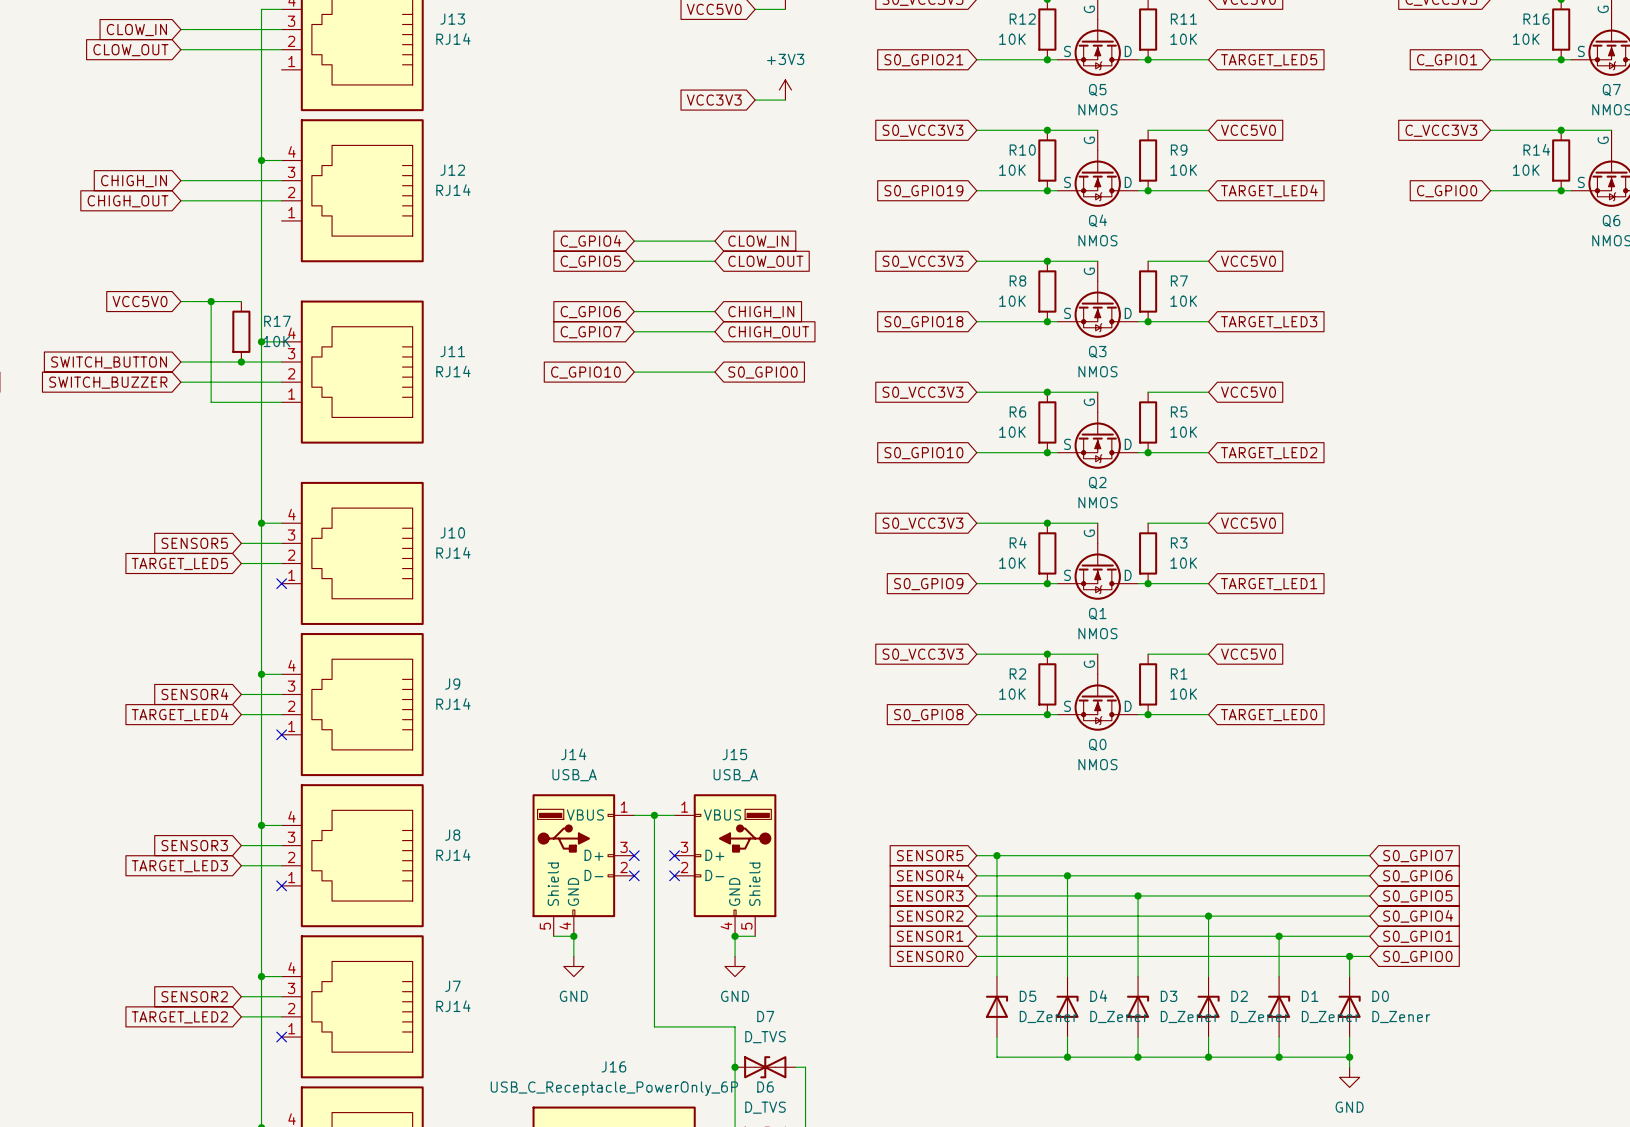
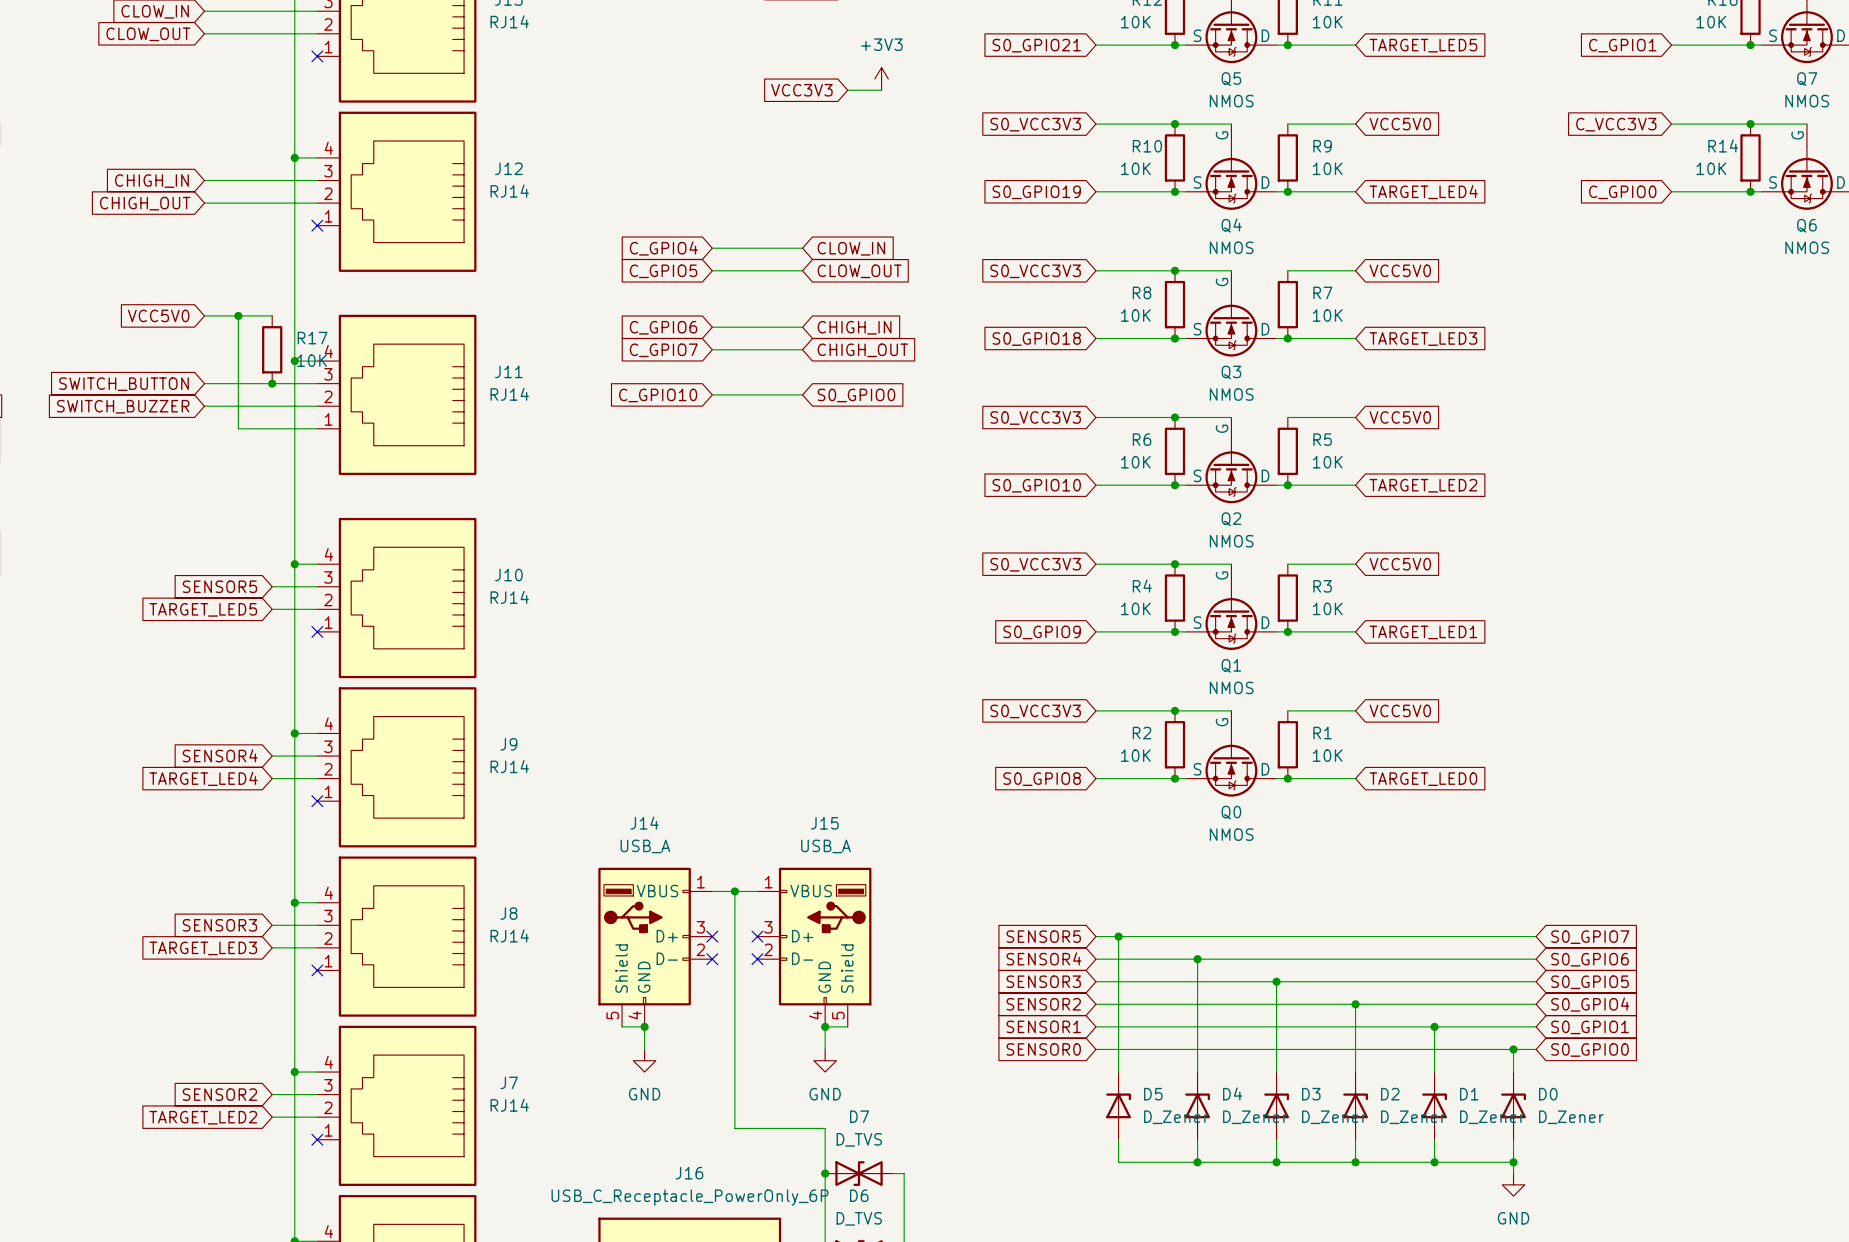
no-connect mark: none -> (317, 56)
no-connect mark: none -> (317, 225)

